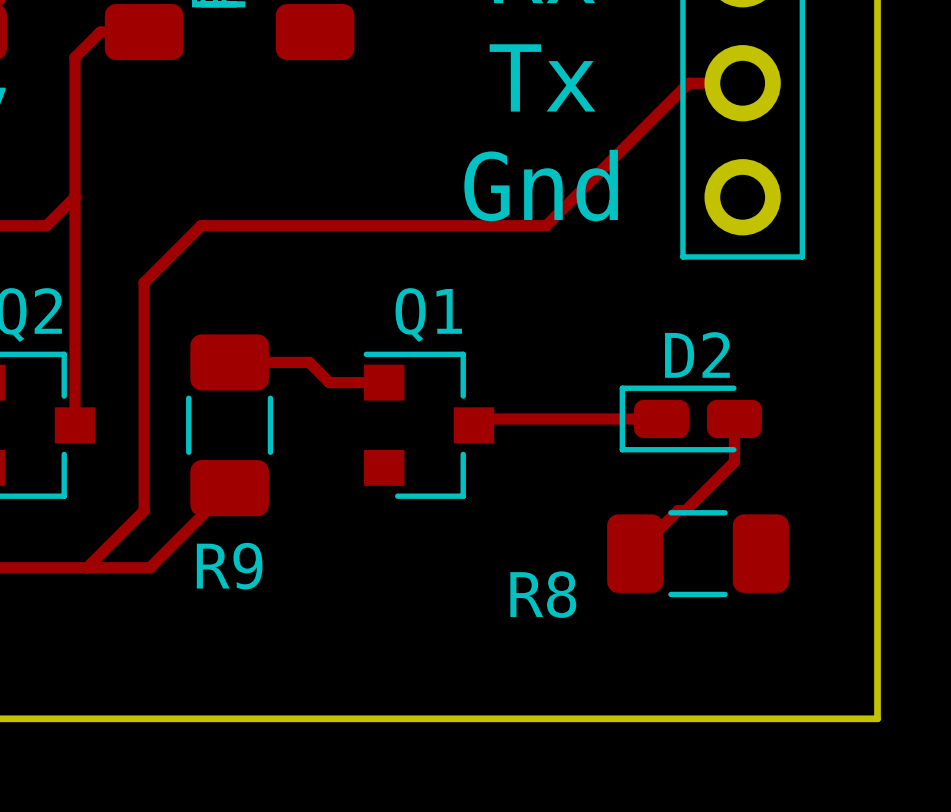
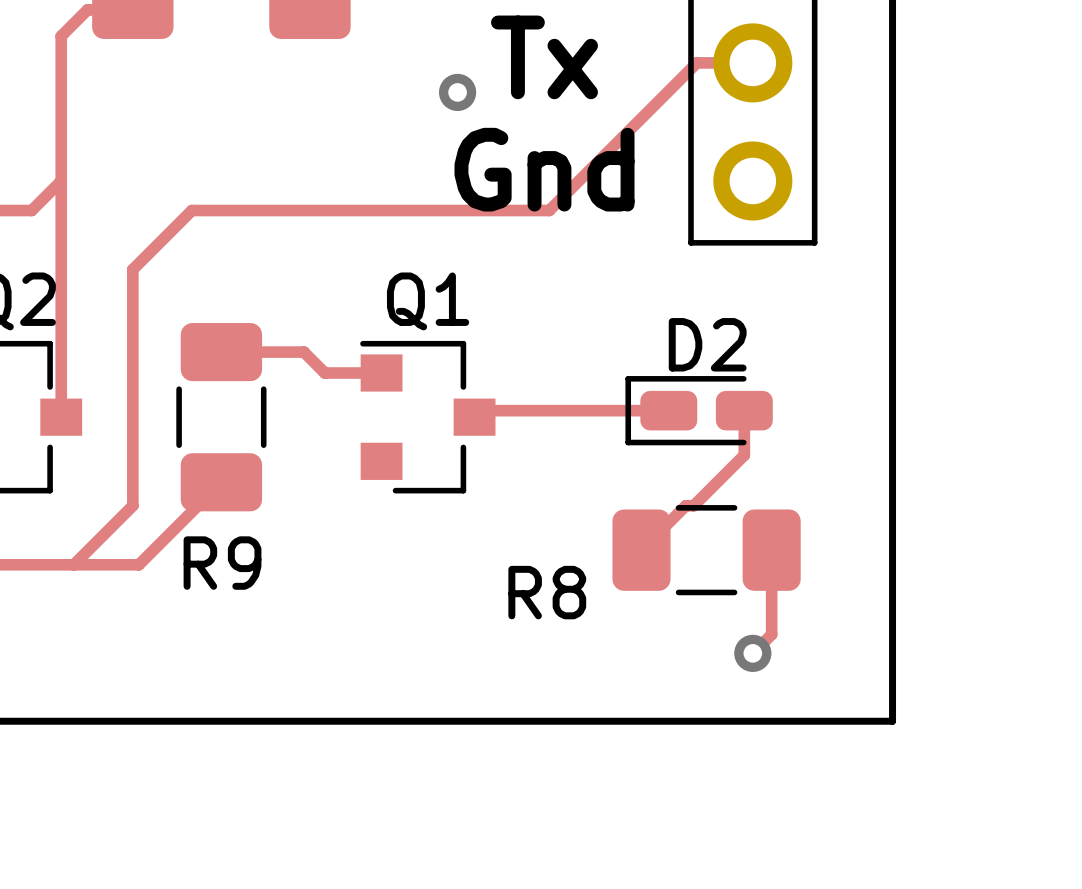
via: none -> (457, 92)
track: none -> (771, 550) (771, 634) (752, 653)
via: none -> (752, 653)

